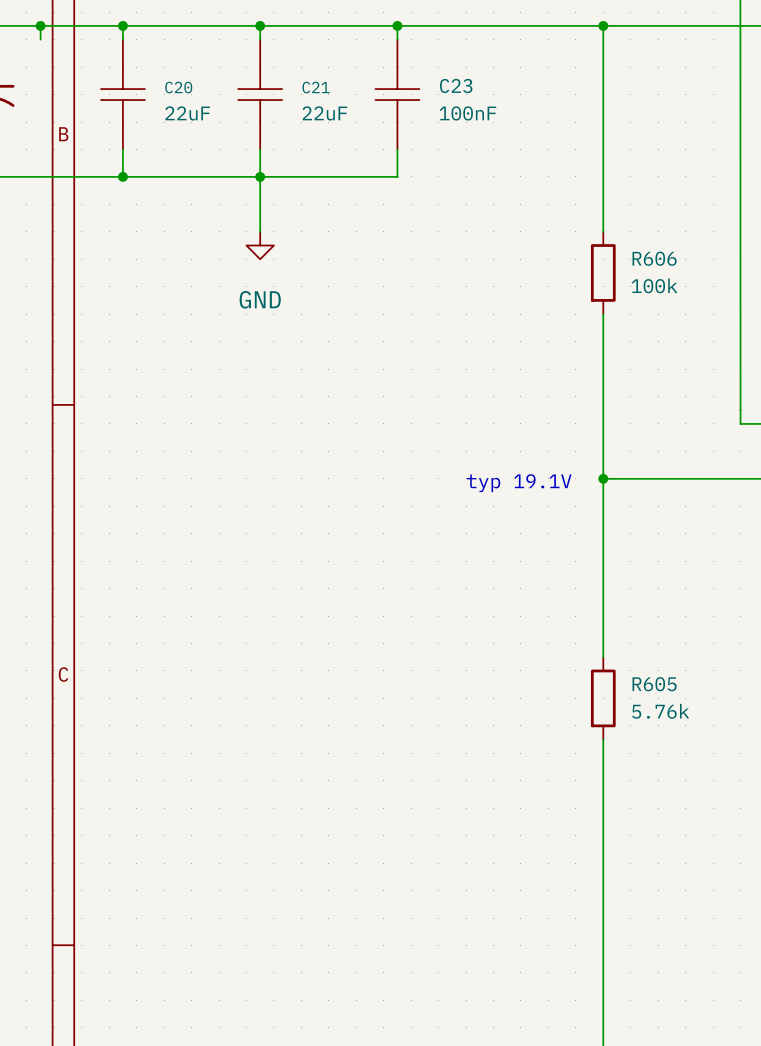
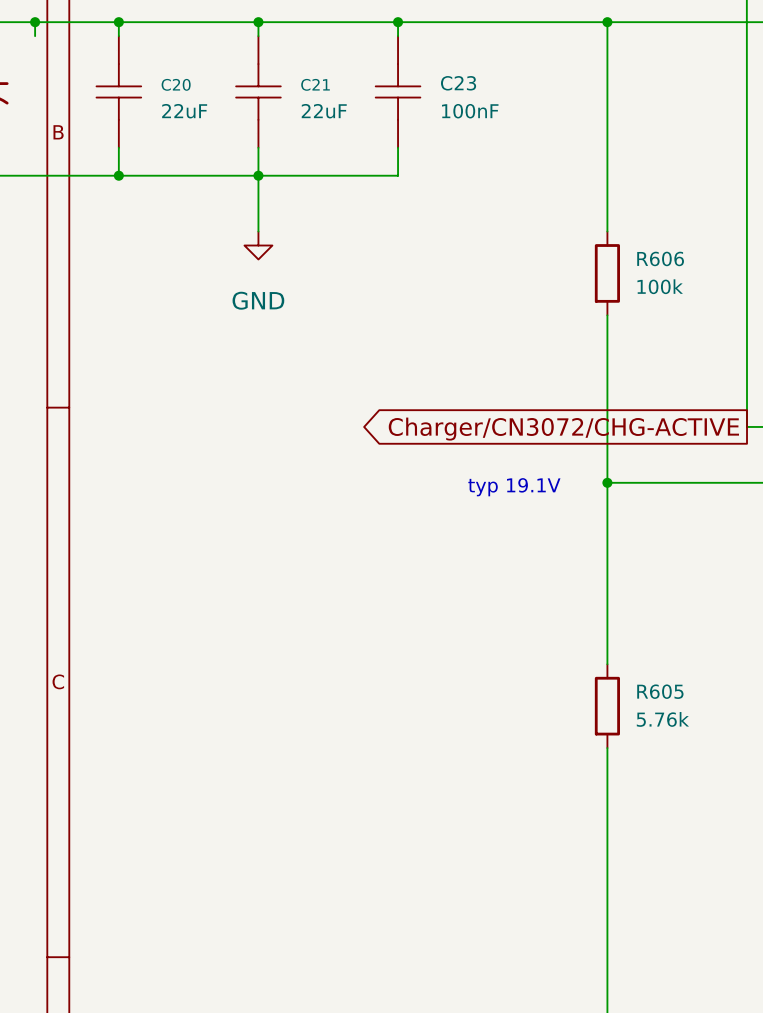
global label: none -> Charger/CN3072/CHG-ACTIVE (563, 429)

